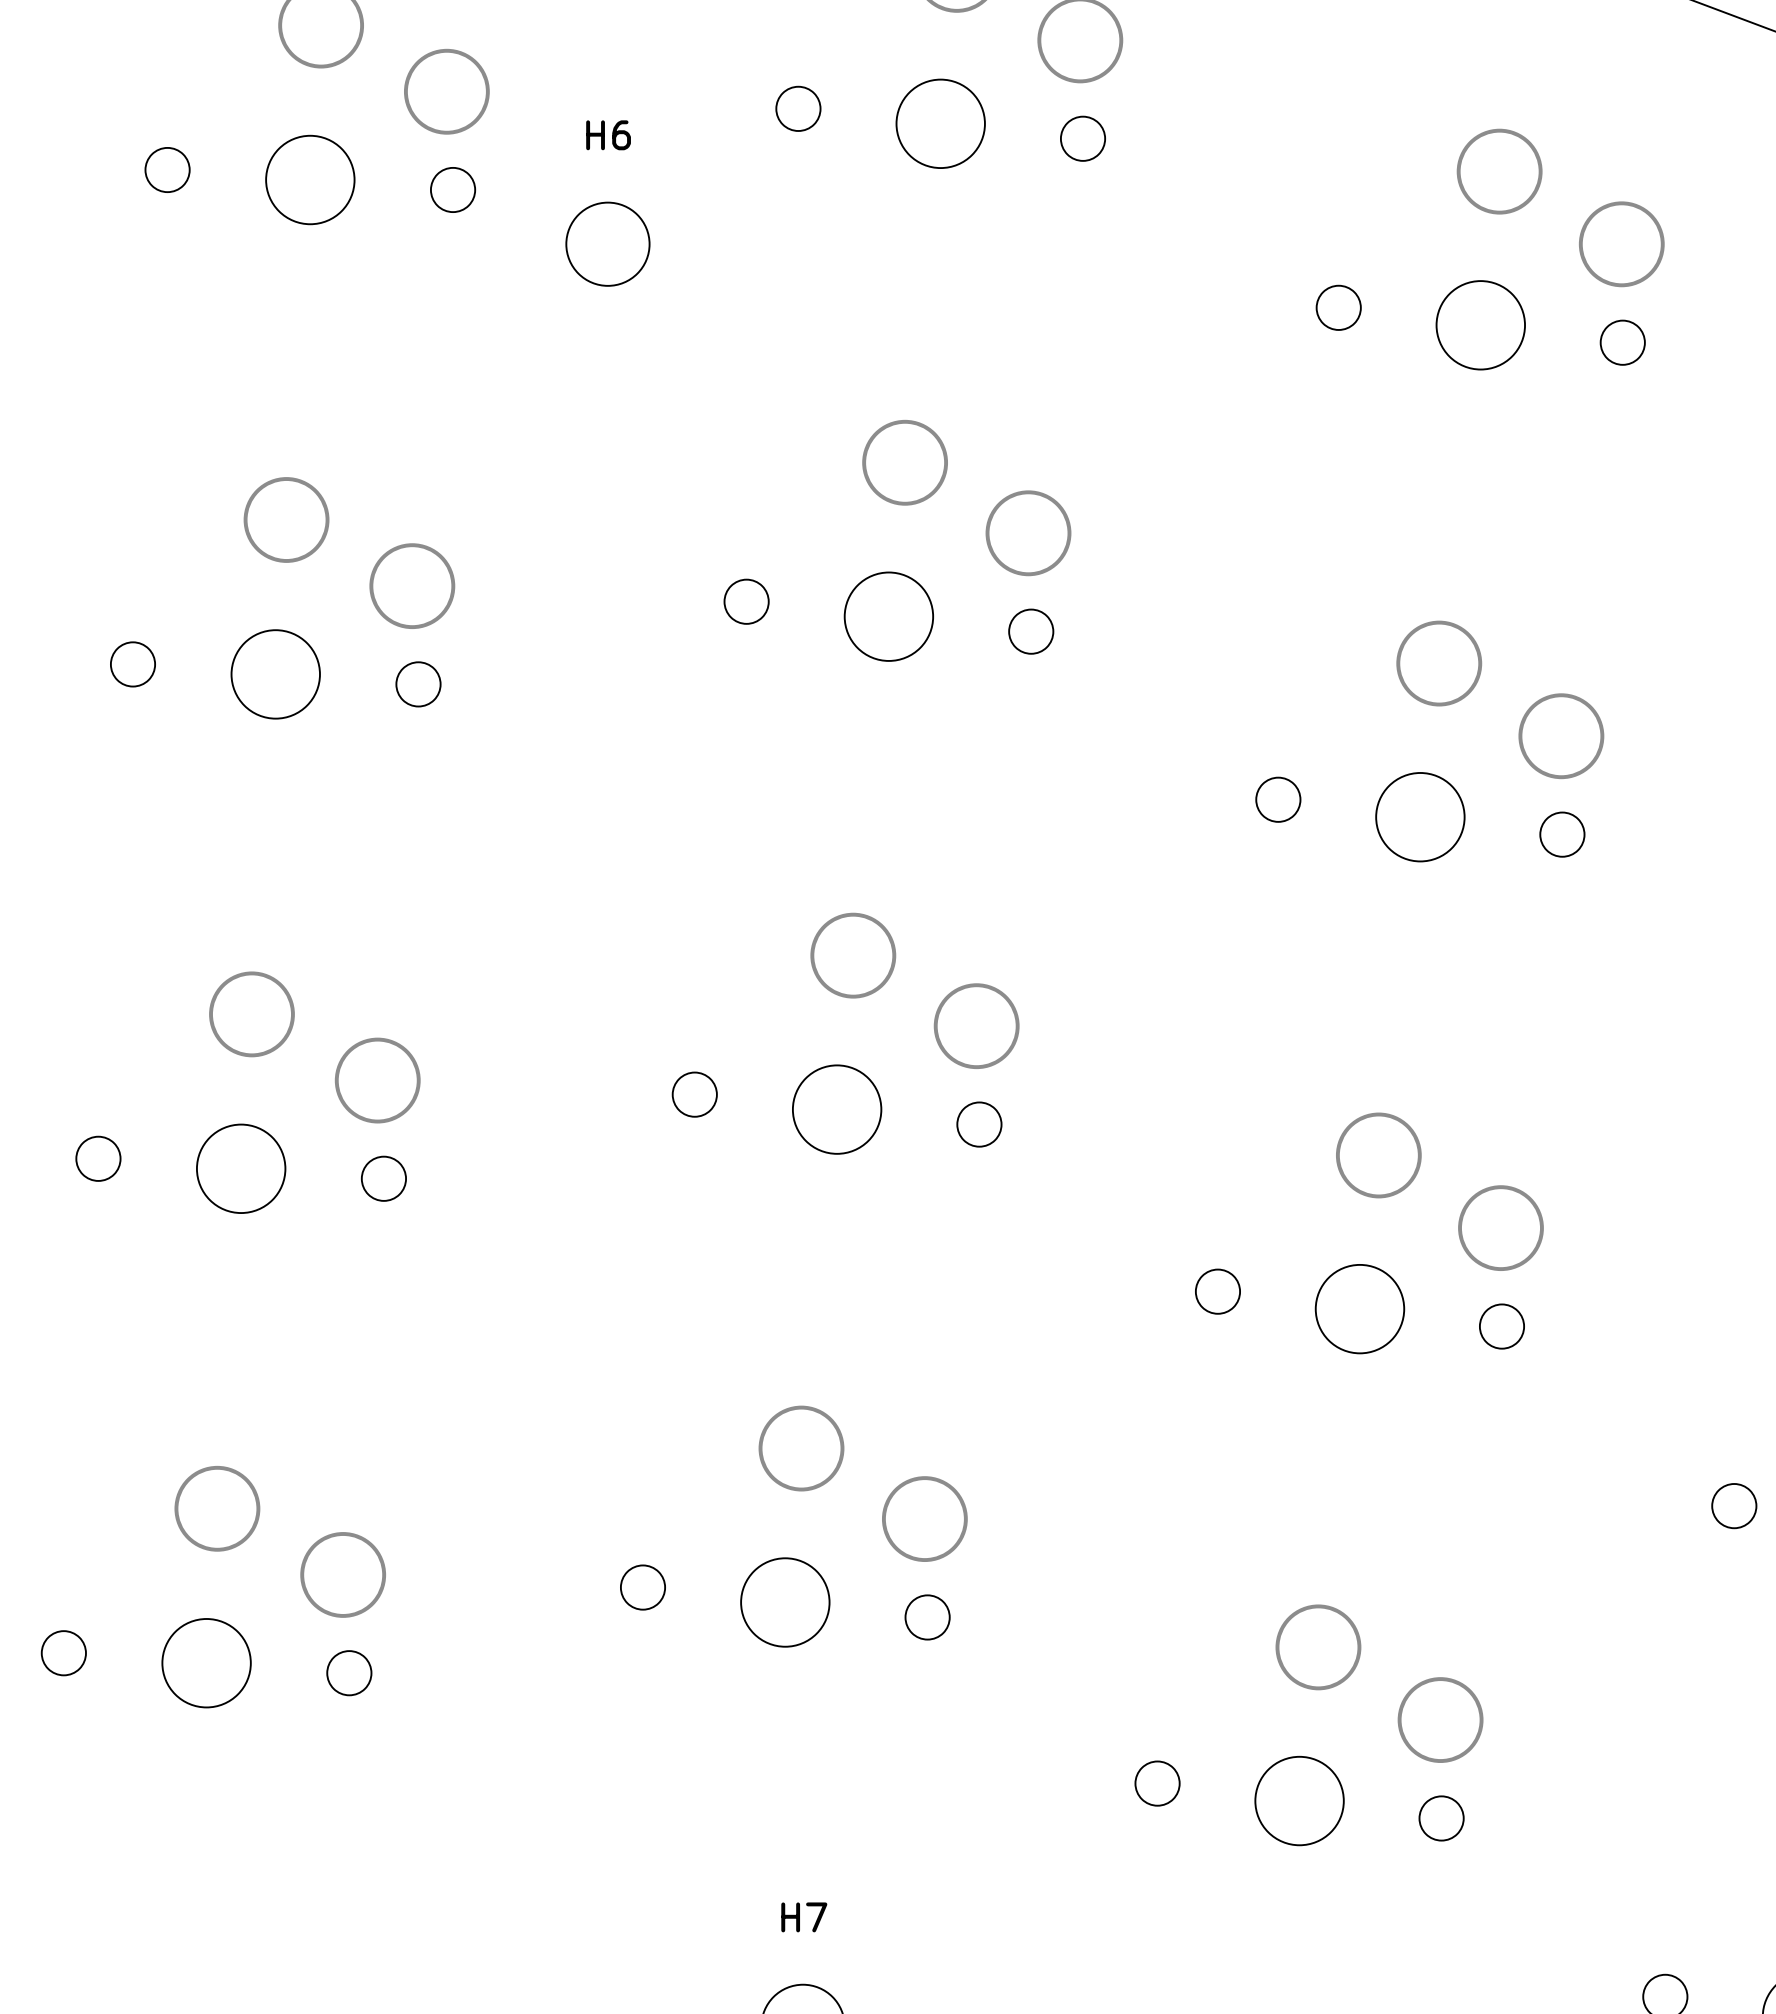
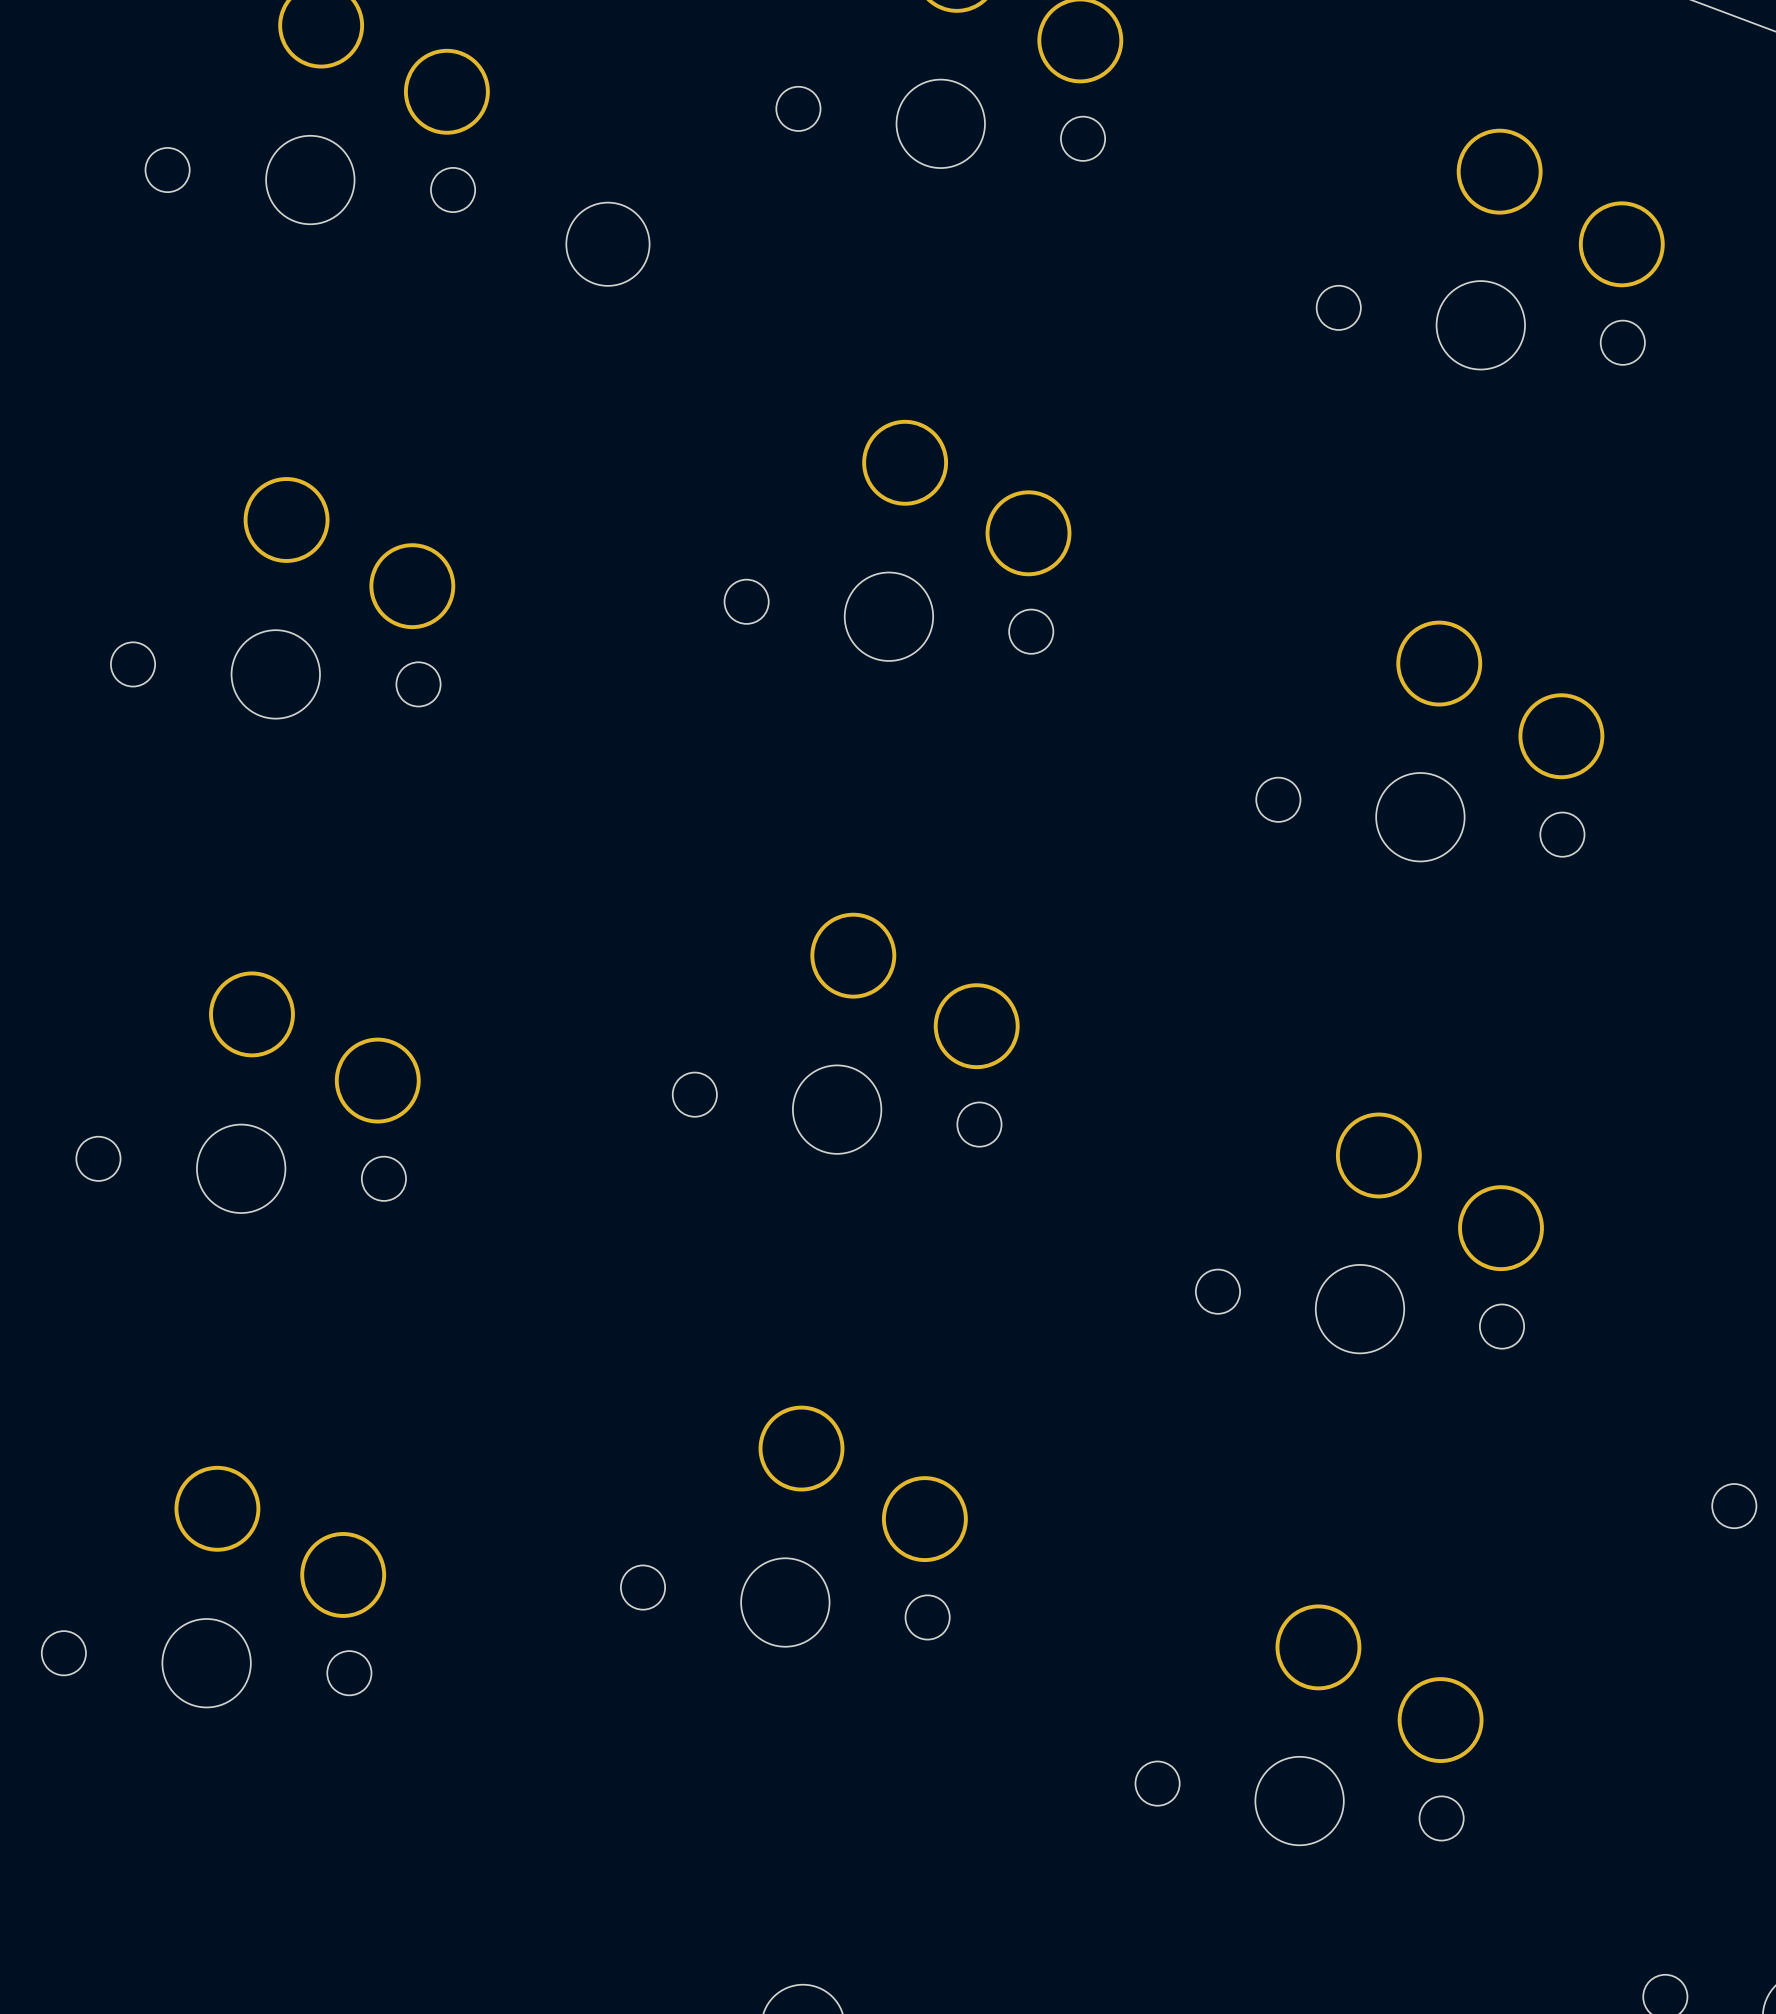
H6 name: H6 (608, 135) -> none
H7 name: H7 (804, 1917) -> none

